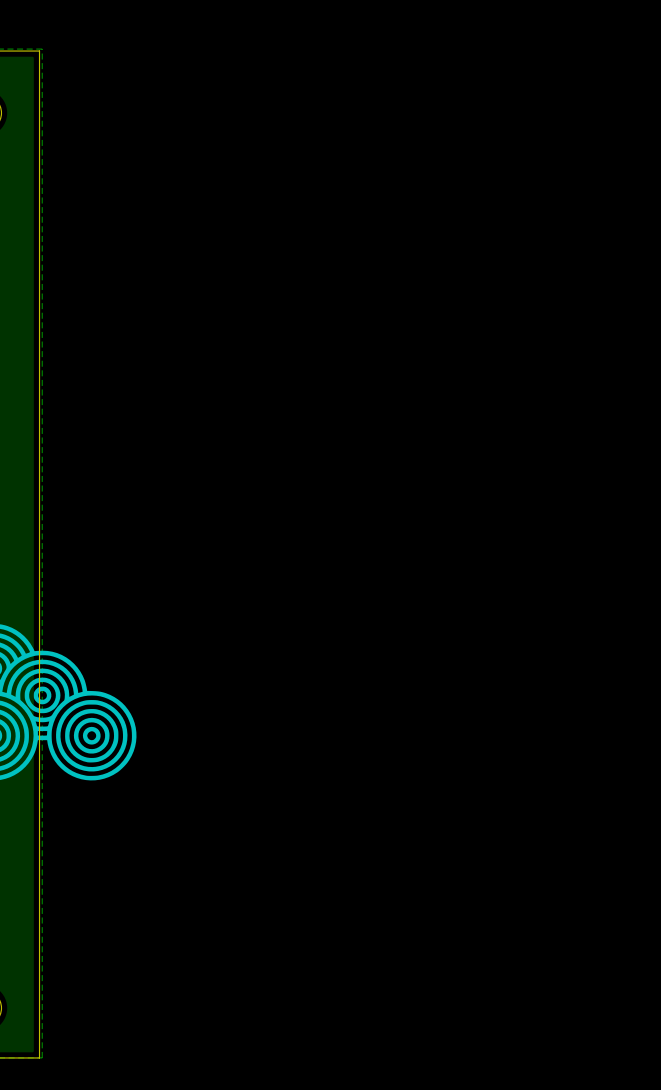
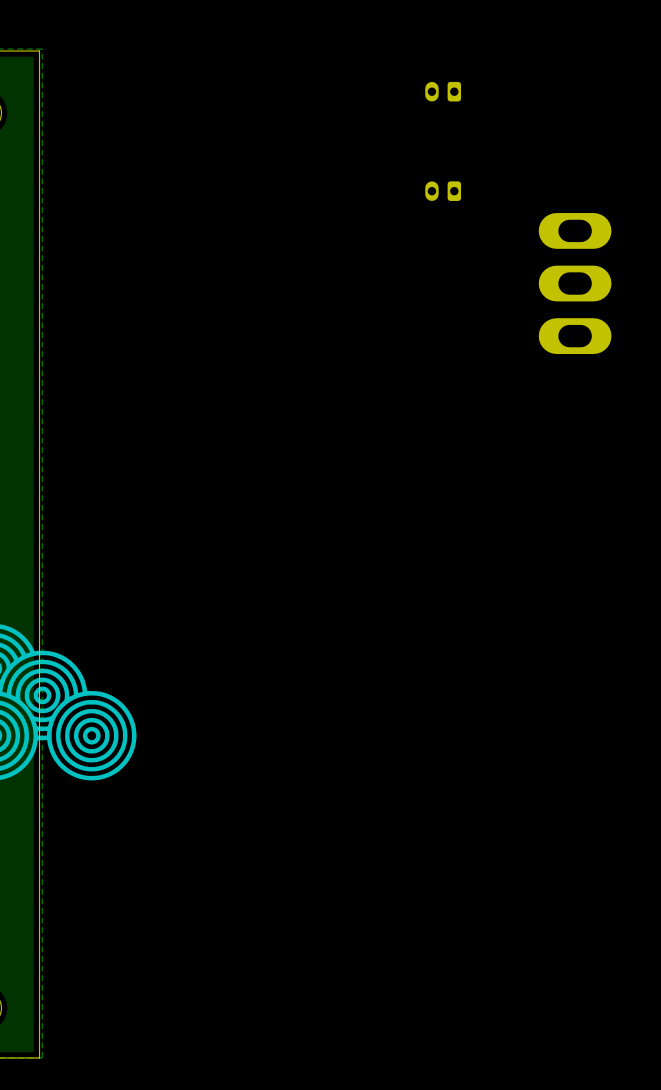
part: none -> (443, 91)
part: none -> (443, 191)
part: none -> (575, 283)

